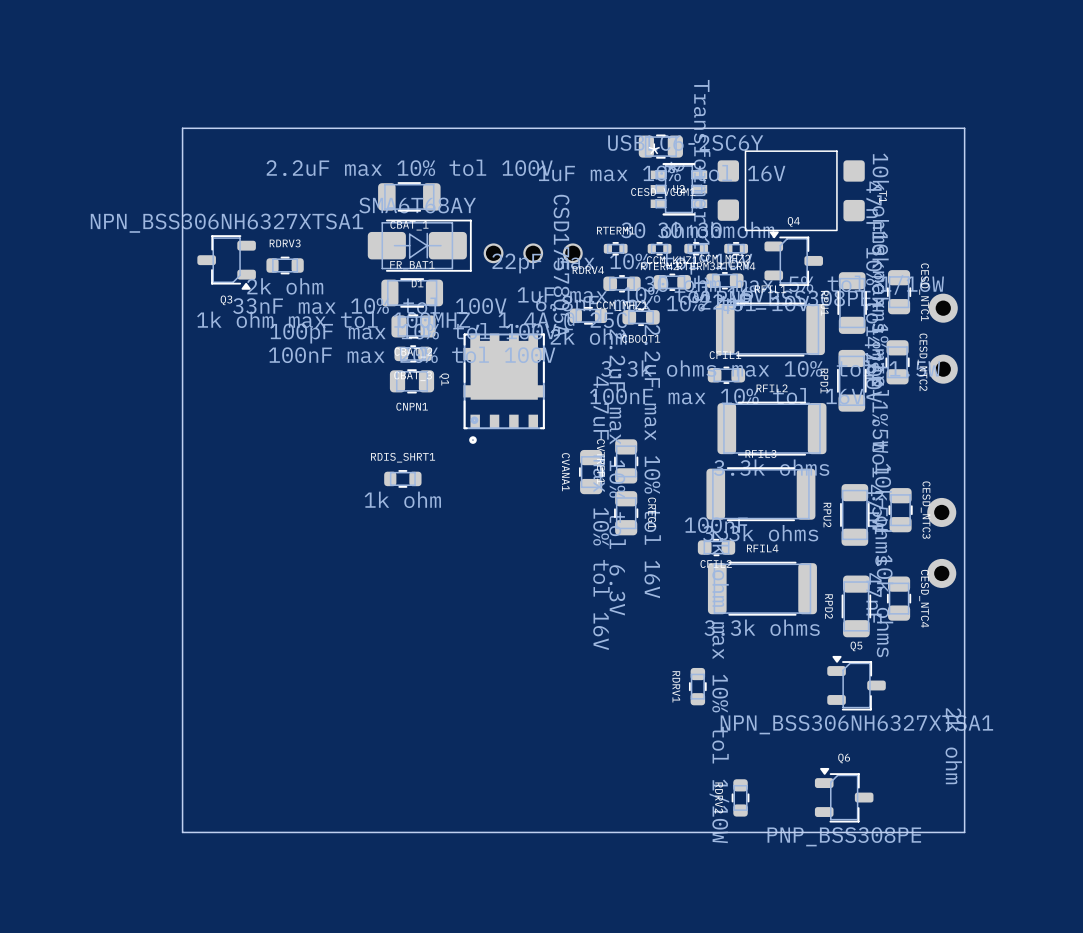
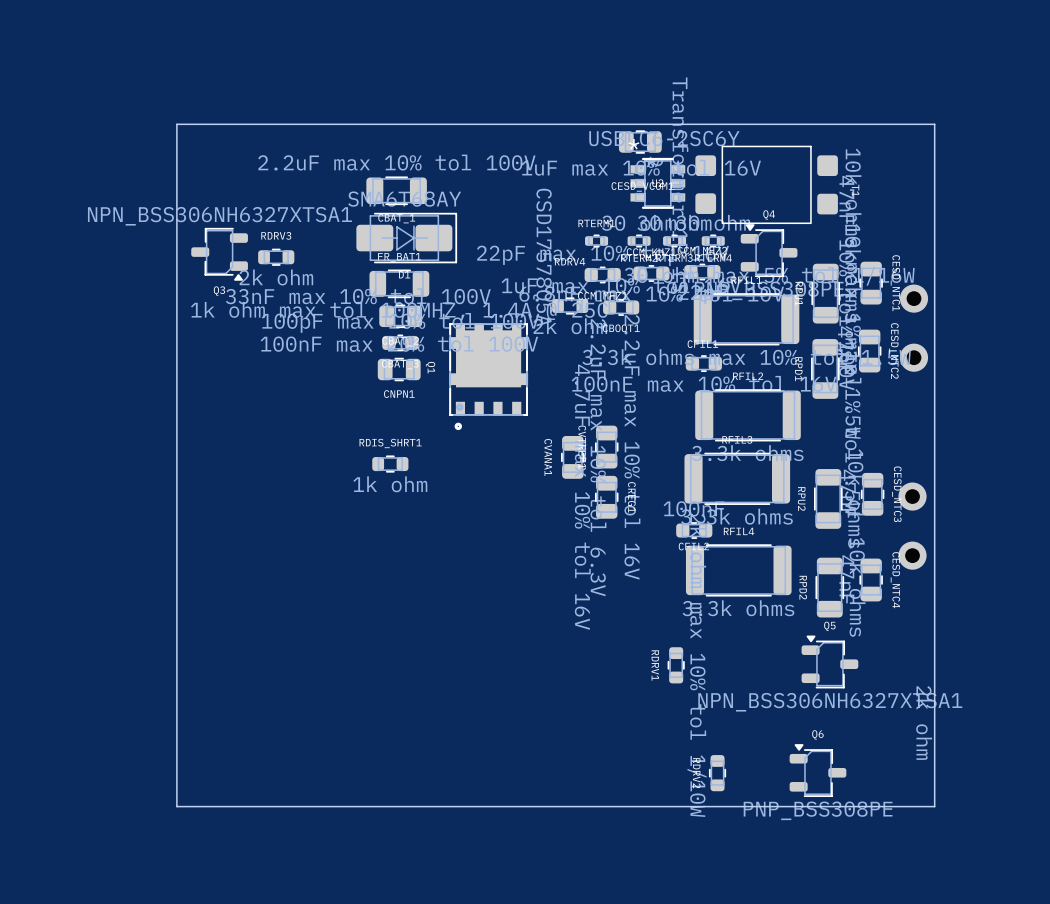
part: (533, 253) -> none

